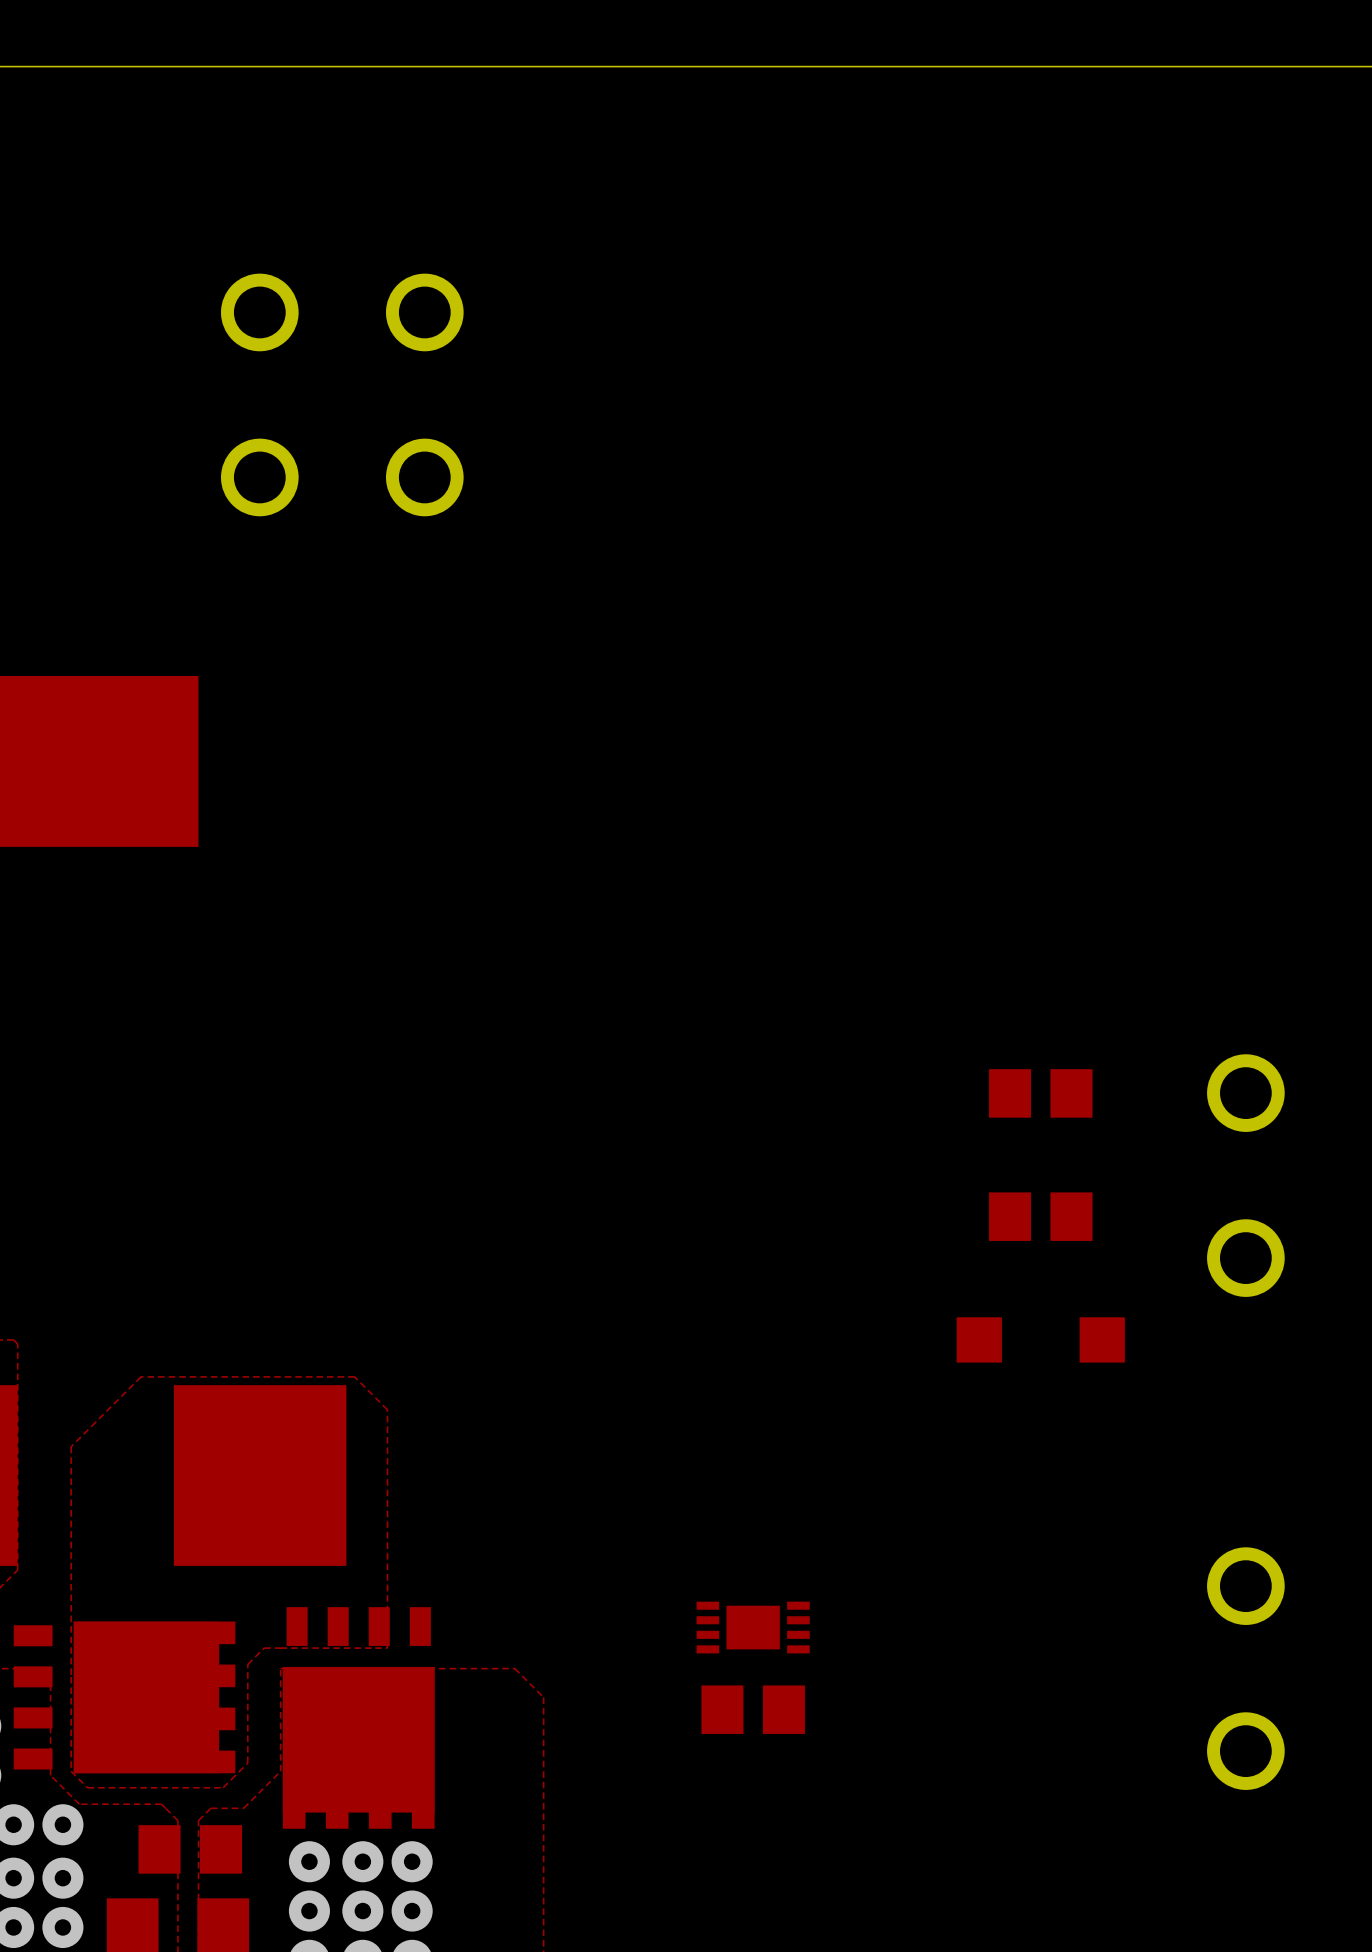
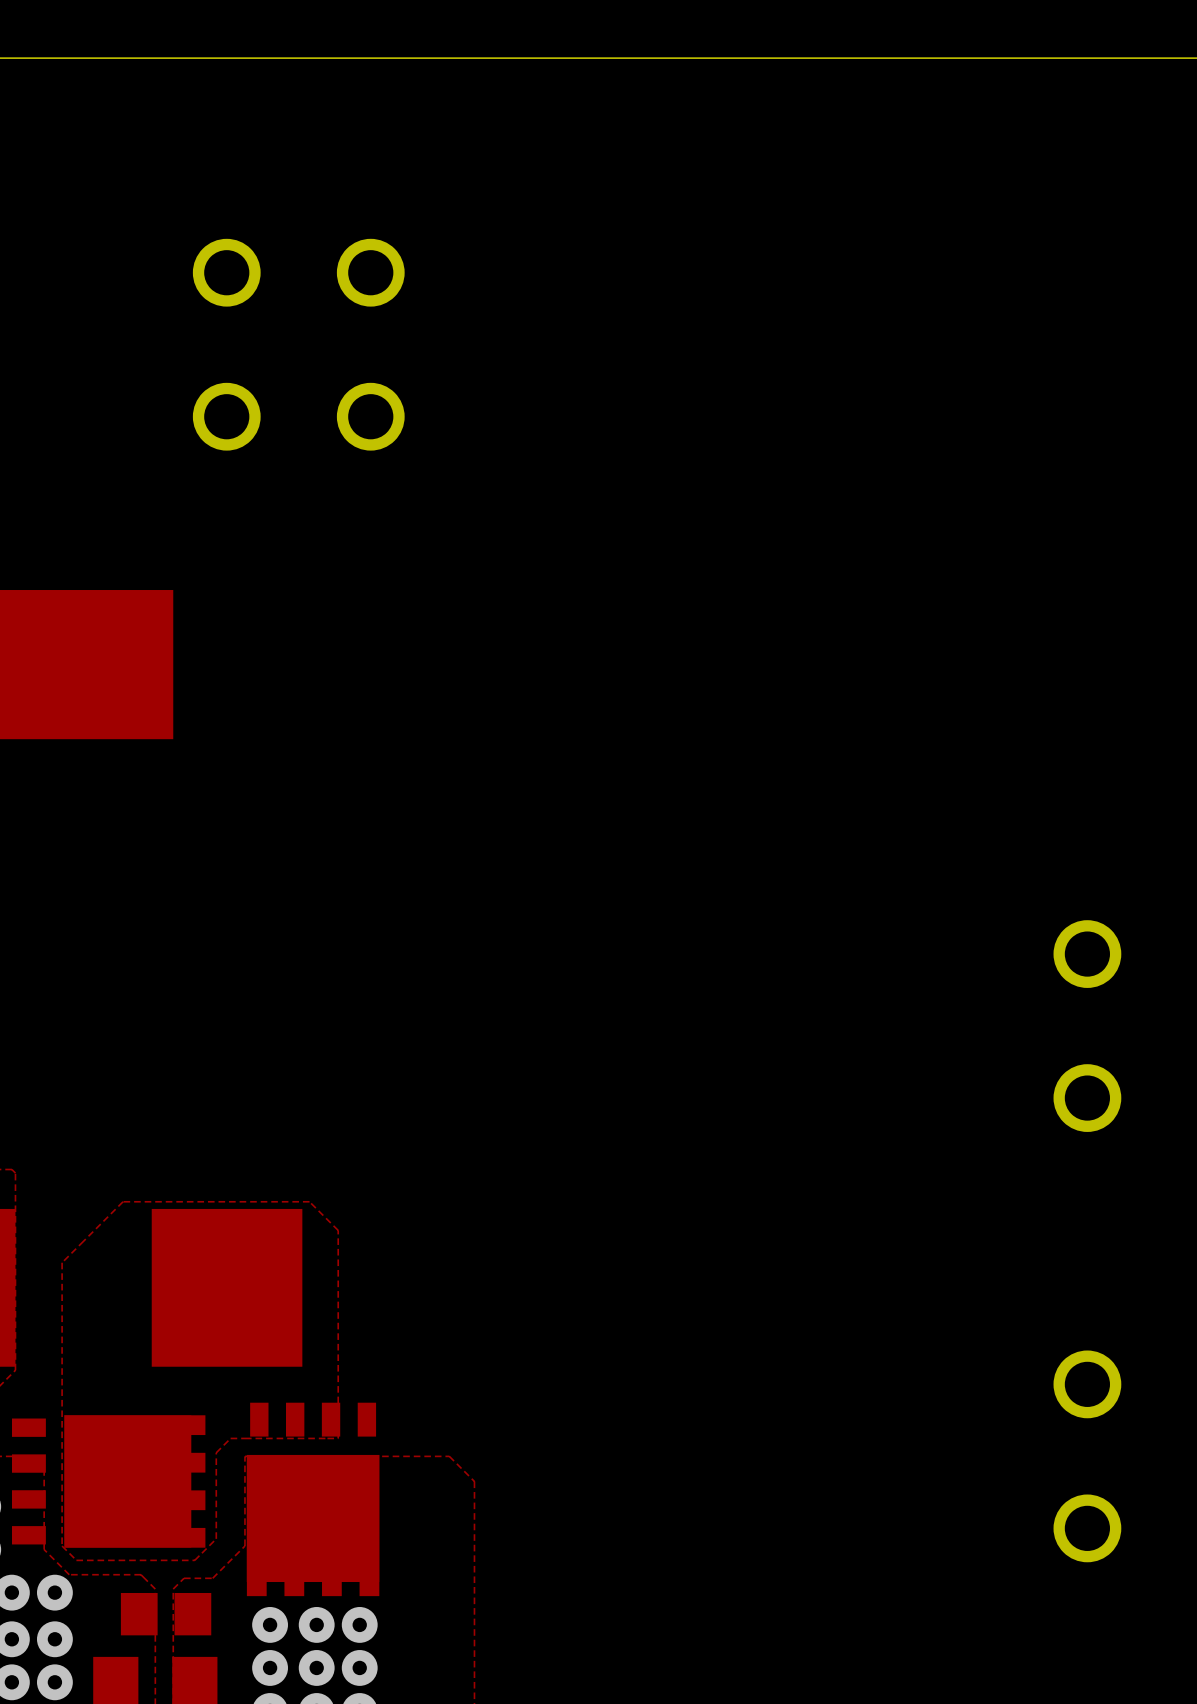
part: (1040, 1093) -> none
part: (1040, 1216) -> none
part: (1040, 1339) -> none
part: (753, 1627) -> none
part: (753, 1709) -> none

